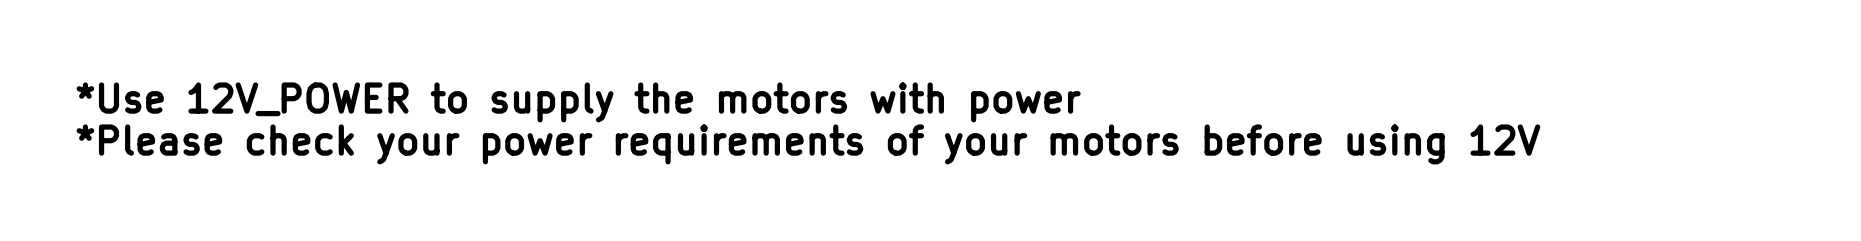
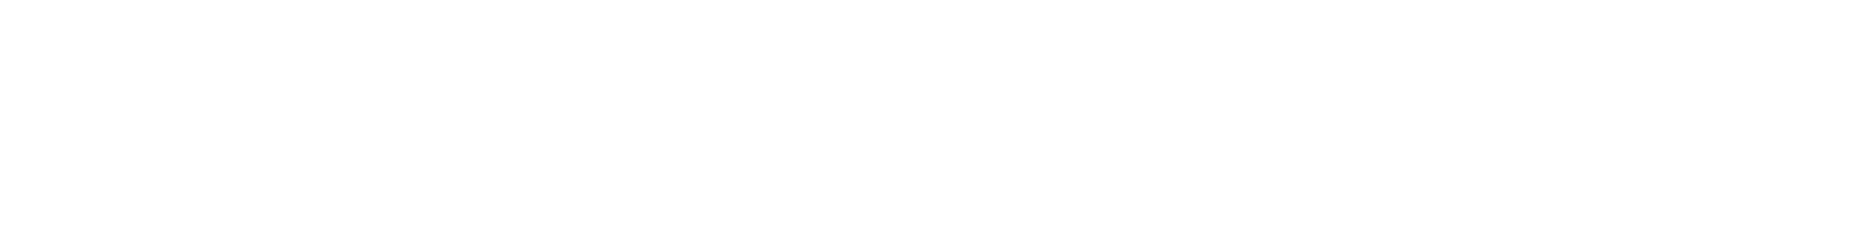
text: *Use 12V_POWER to supply the motors with power (578, 102) -> none
text: *Please check your power requirements of your motors before using 12V (808, 144) -> none

